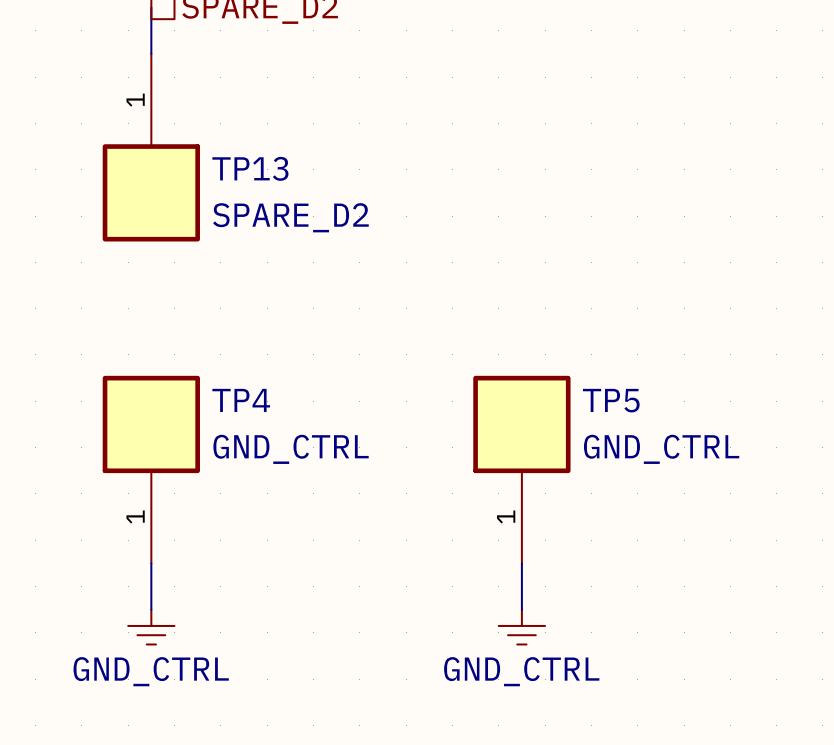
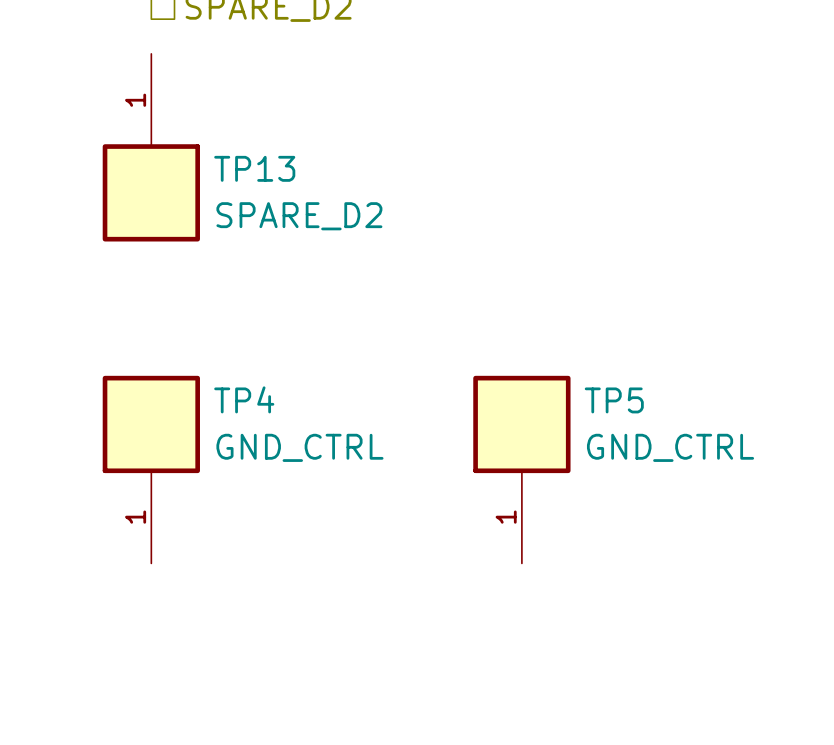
wire: (151, 7) (151, 53) -> none
wire: (151, 563) (151, 609) -> none
wire: (521, 563) (521, 609) -> none
power symbol: GND_CTRL (151, 627) -> none
power symbol: GND_CTRL (521, 627) -> none

